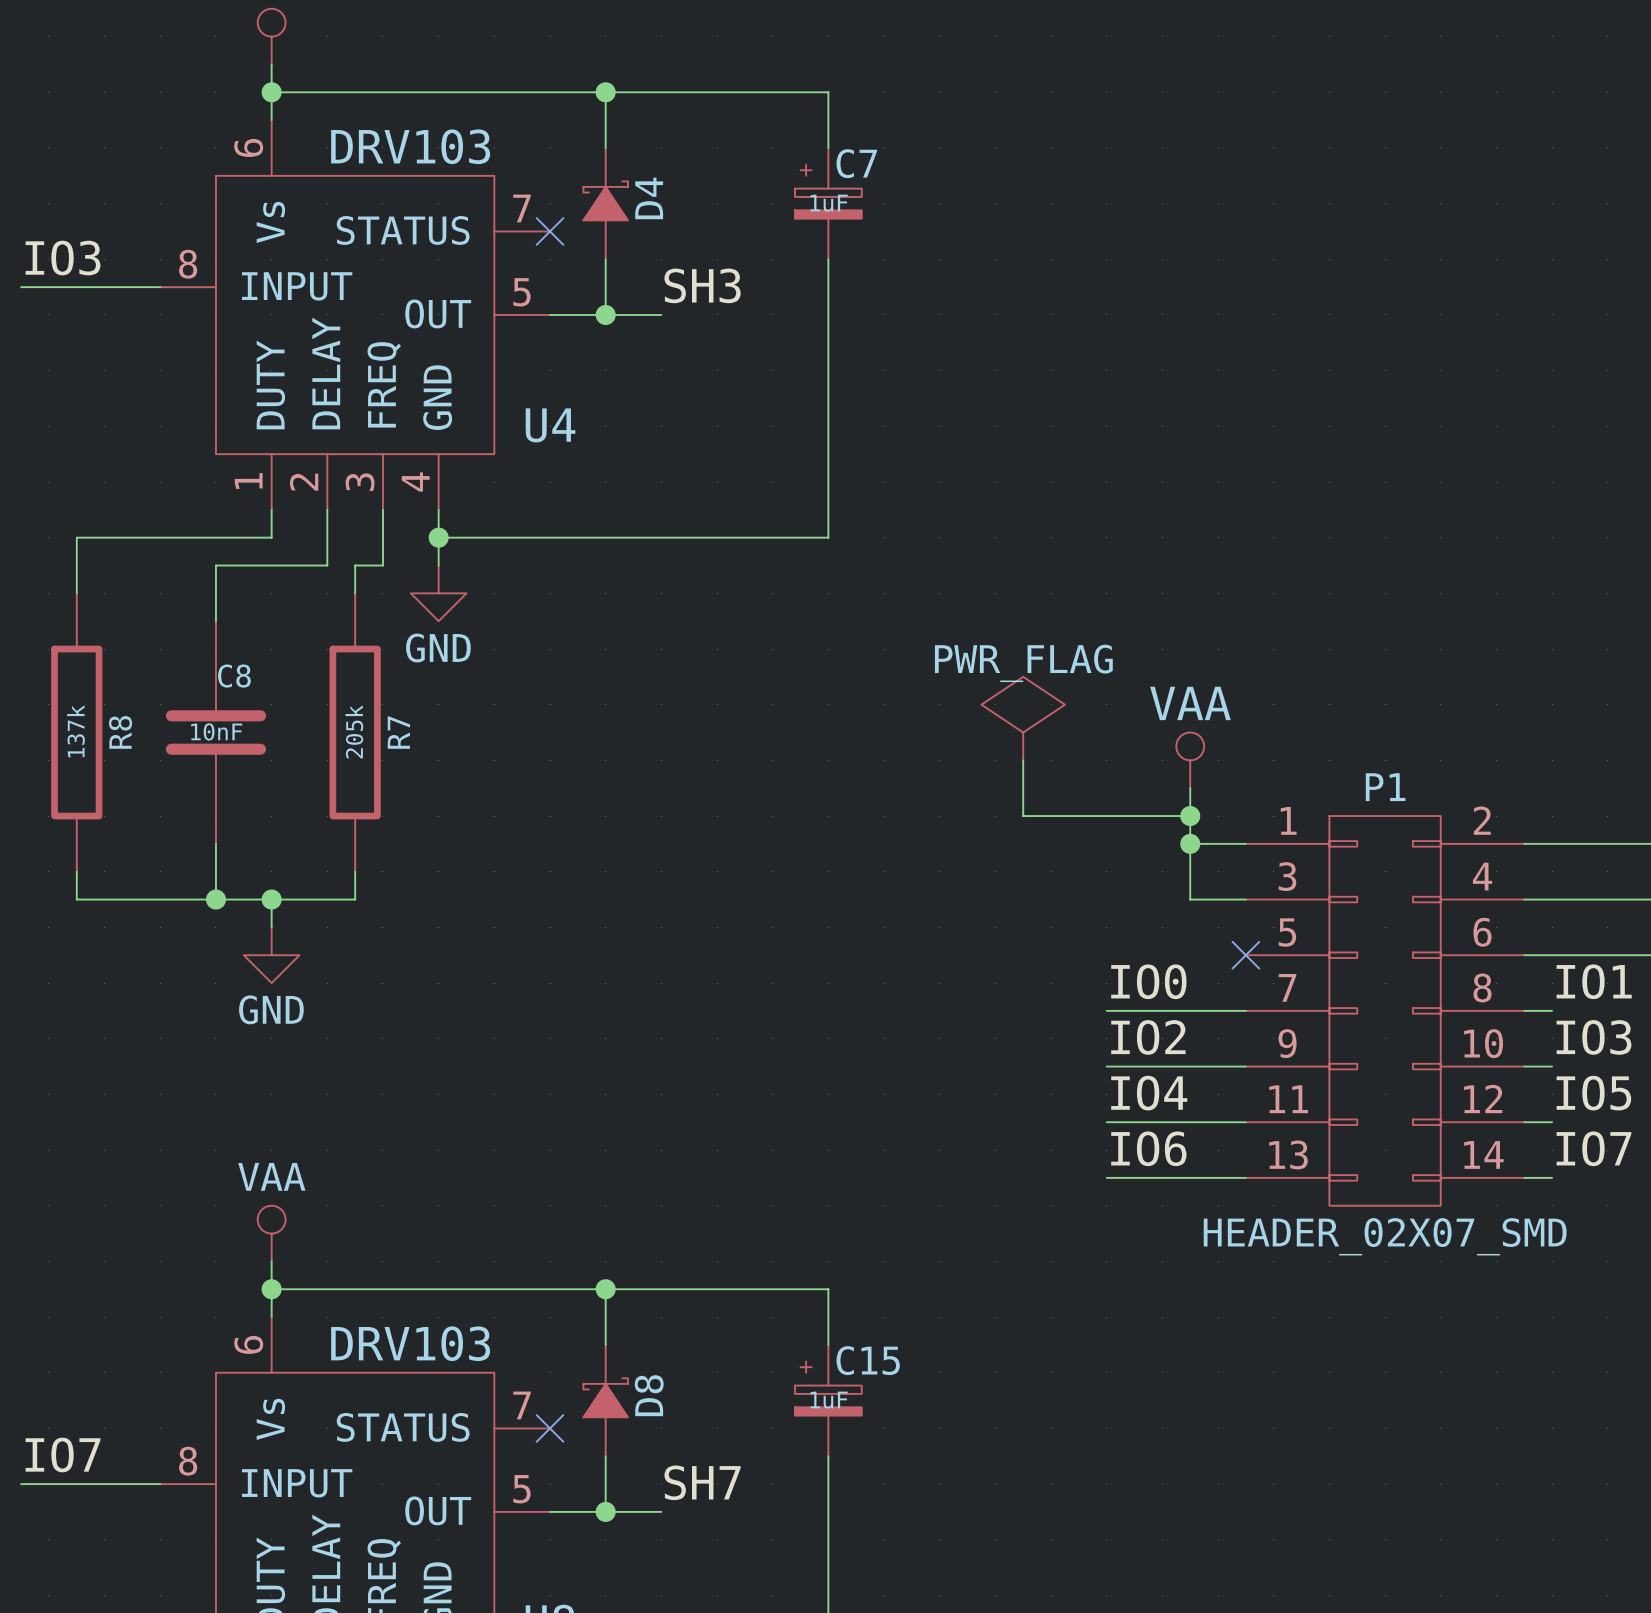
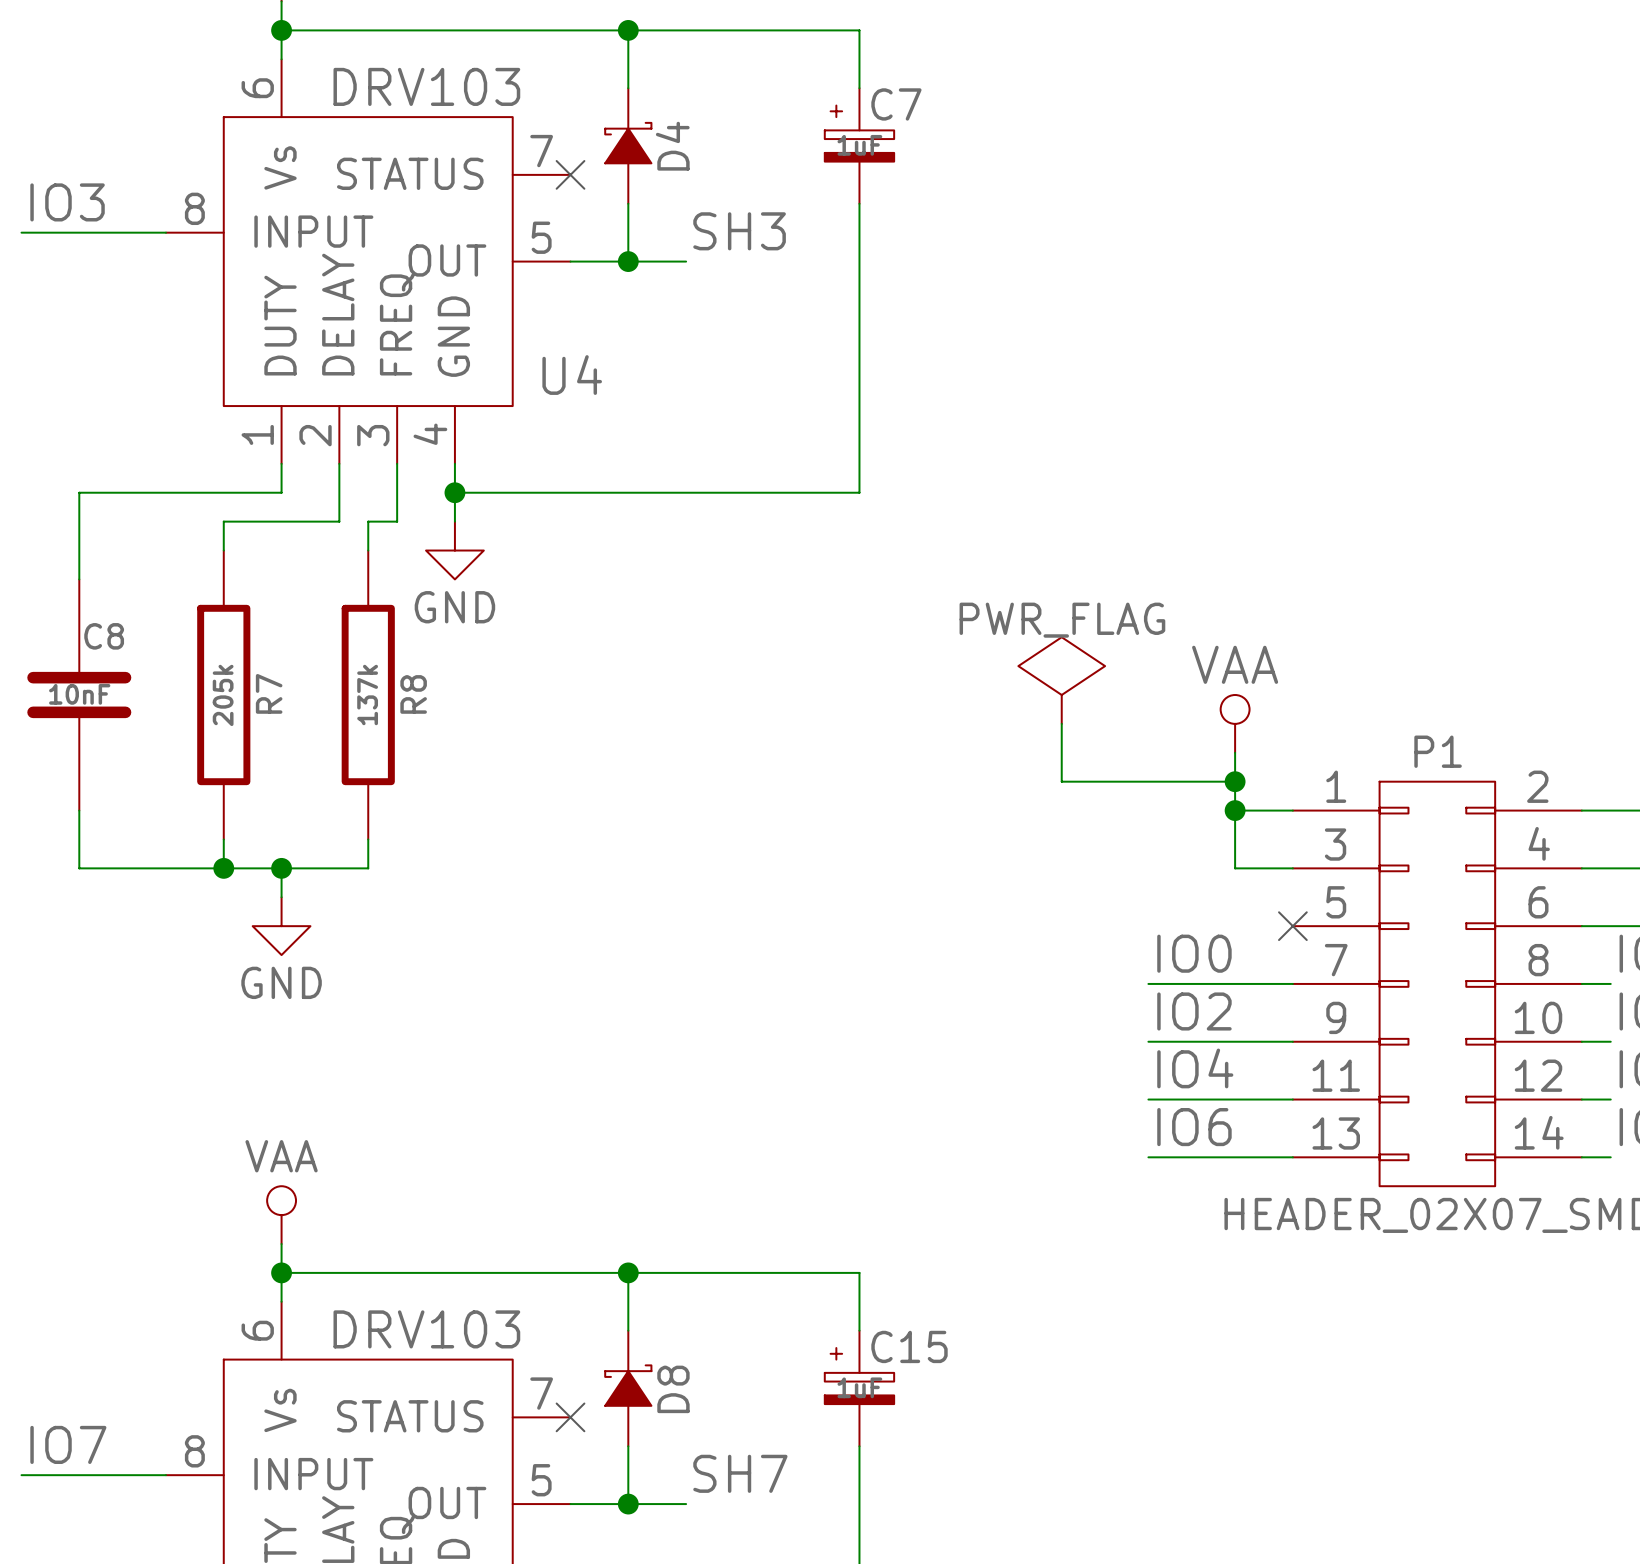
R7 value: 205k (354, 731) -> 137k (367, 695)
R8: 137k (76, 732) -> none
C8 position: (215, 732) -> (79, 695)
R7: none -> 205k (223, 695)
R7 name: R7 (398, 732) -> R8 (413, 694)

